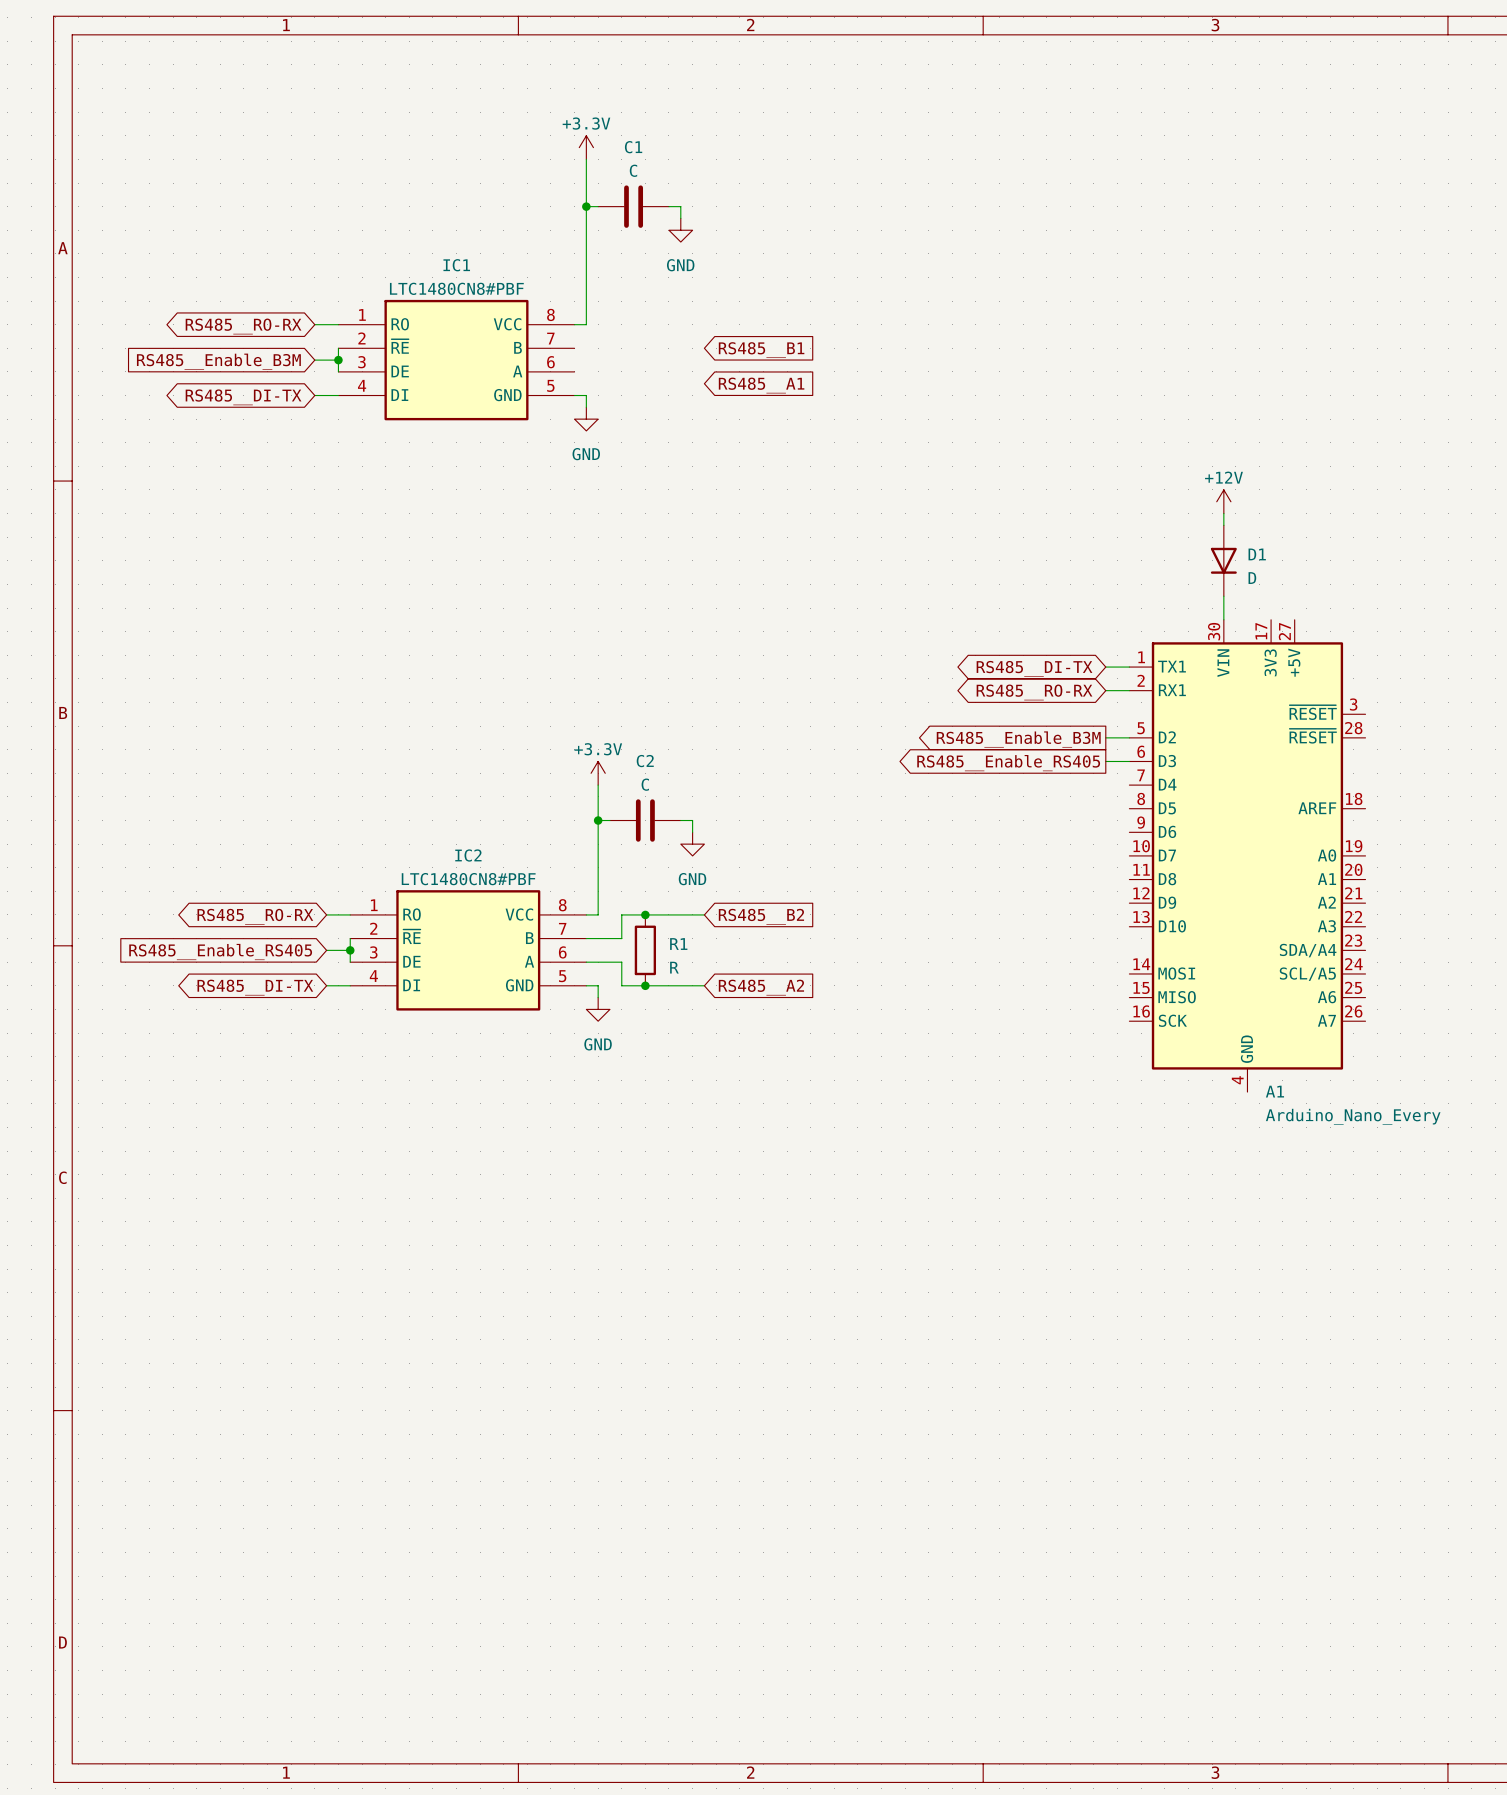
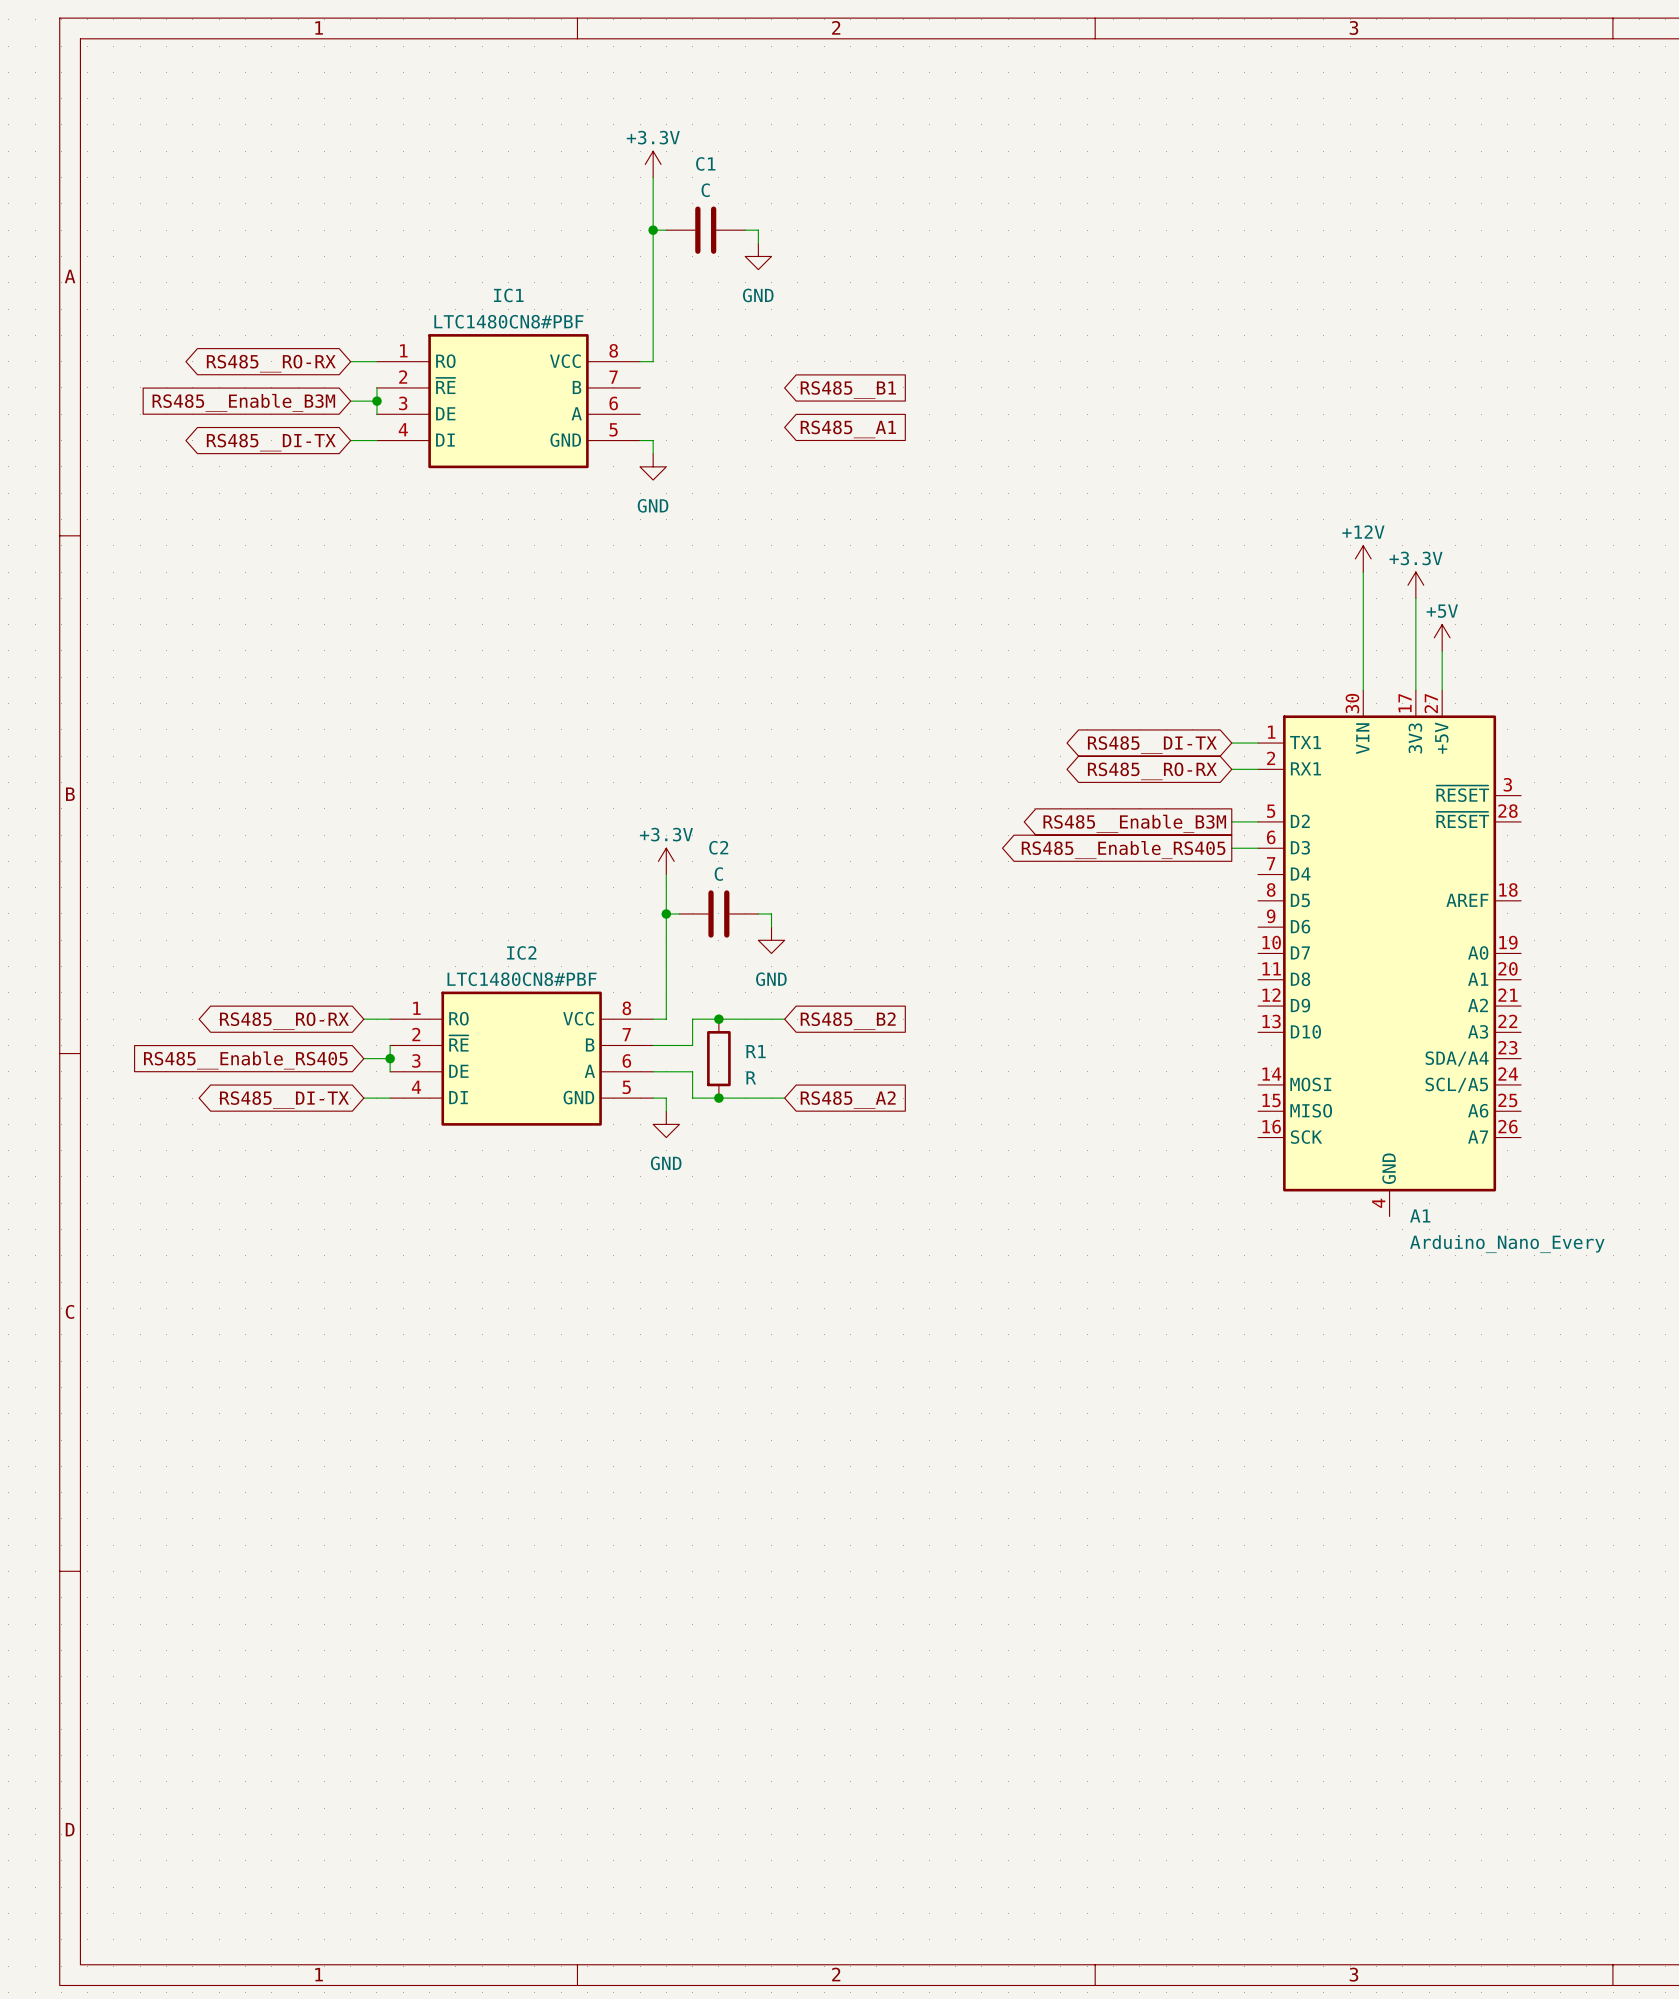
power symbol: none -> +3.3V (1415, 585)
wire: none -> (1415, 598) (1415, 690)
D1: D (1223, 560) -> none
power symbol: none -> +5V (1442, 637)
wire: none -> (1442, 650) (1442, 690)

